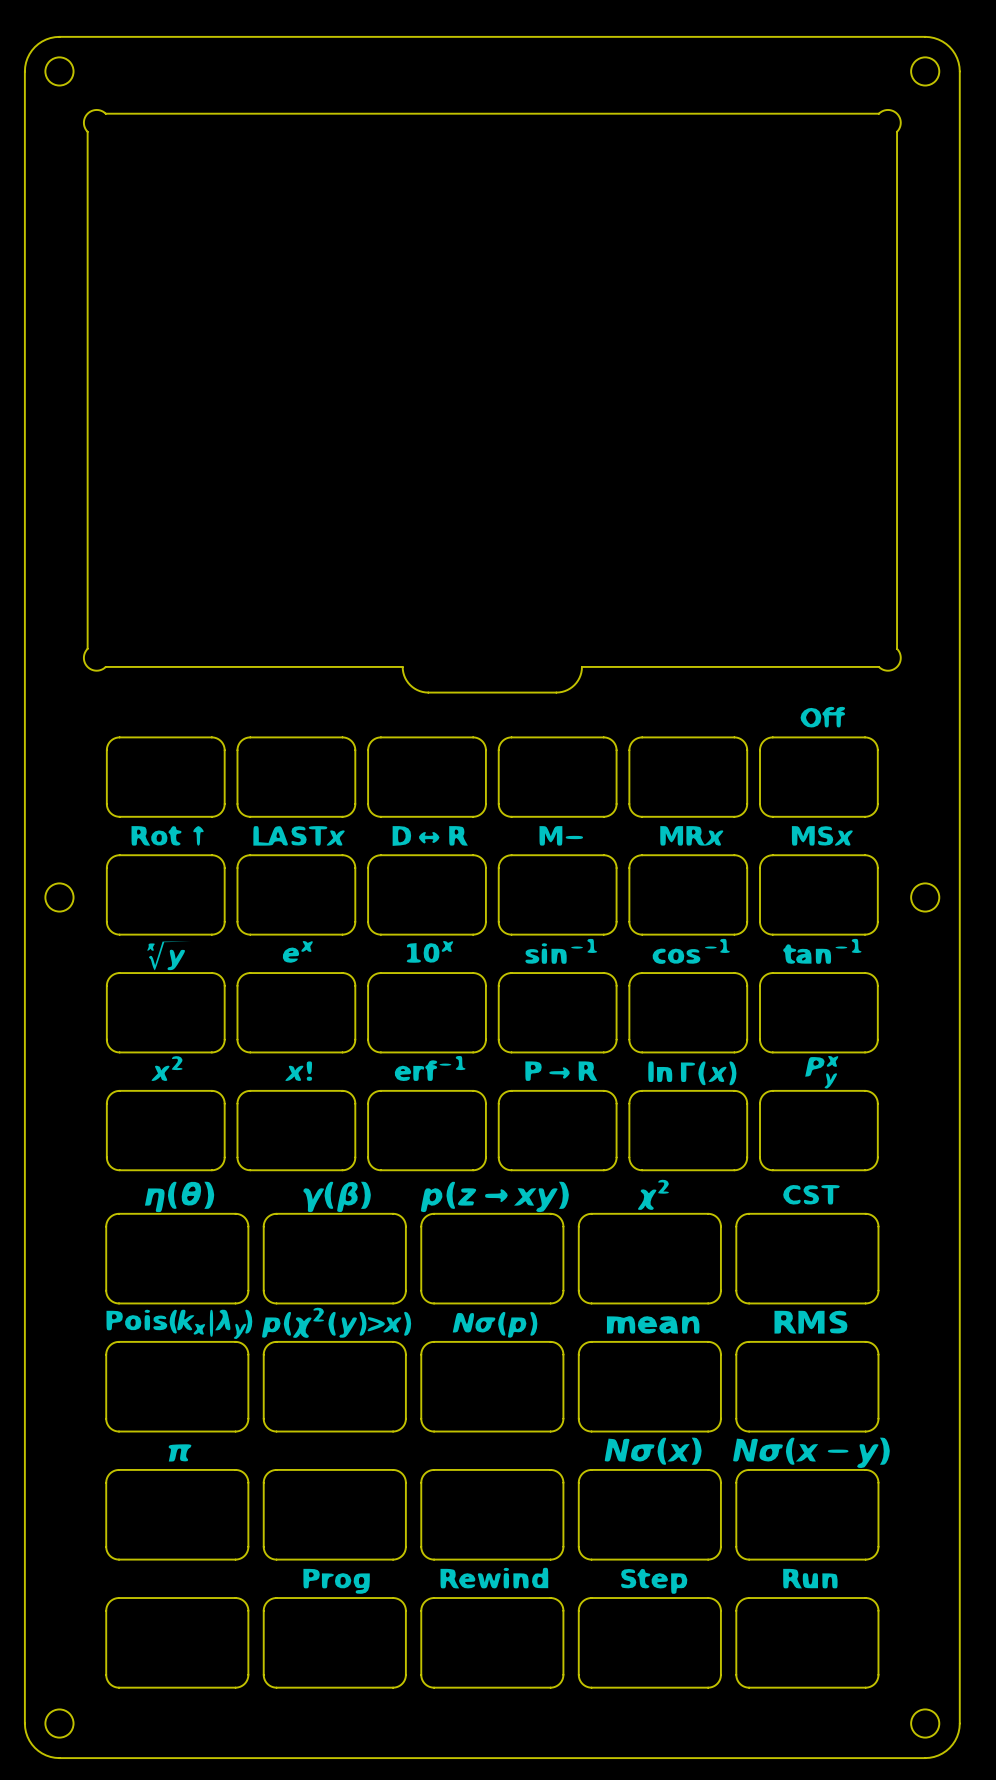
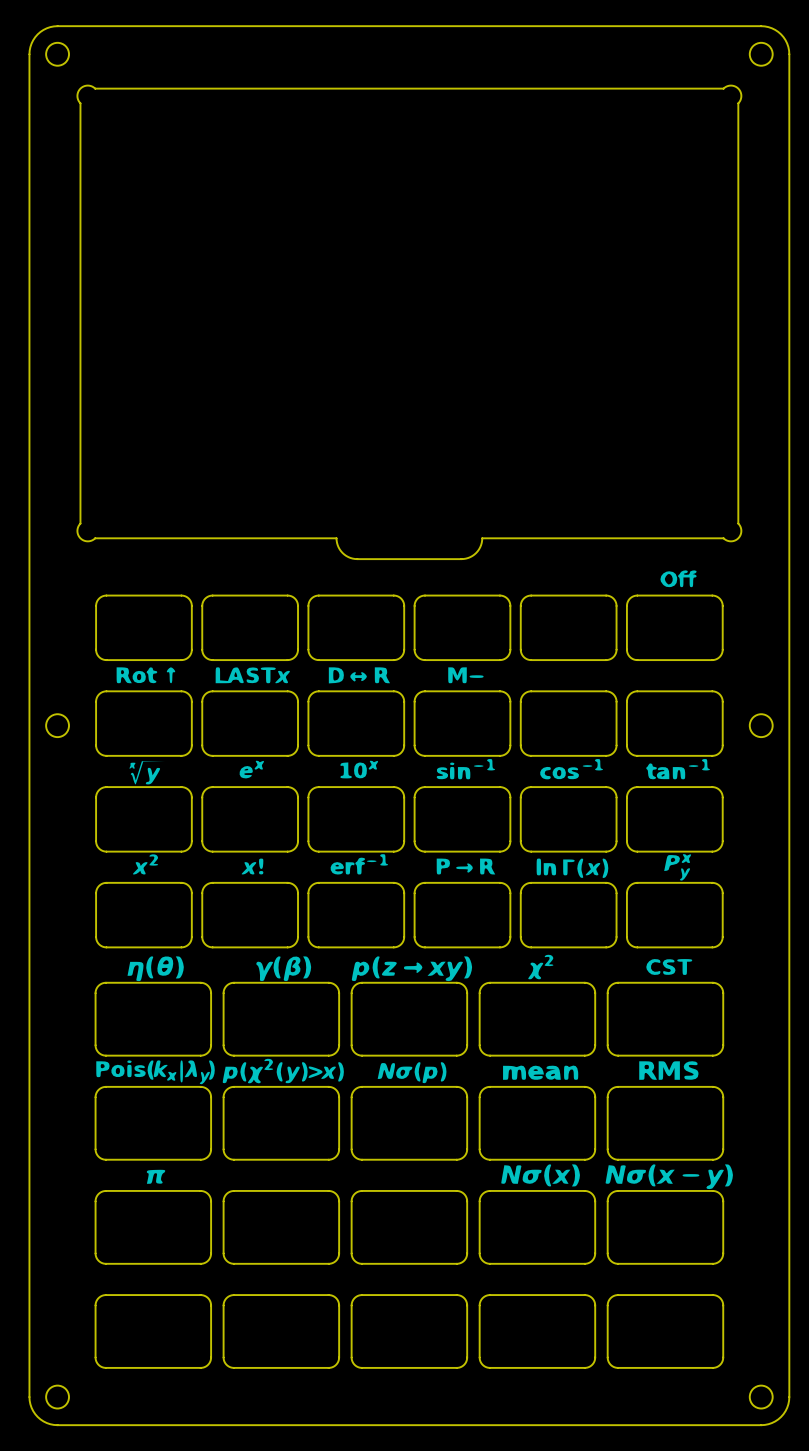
drawing: [106, 706, 890, 1594] -> none
drawing: none -> [96, 570, 733, 1190]

